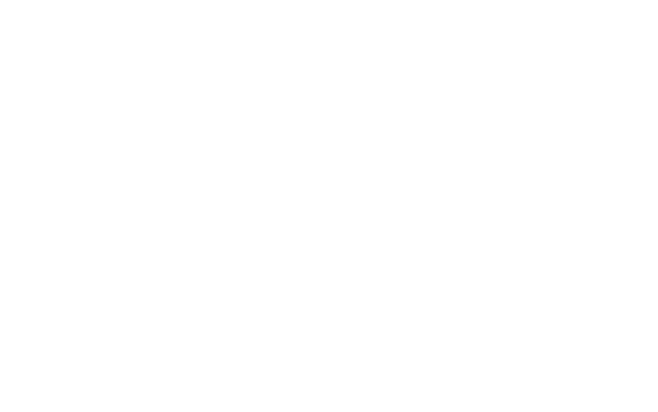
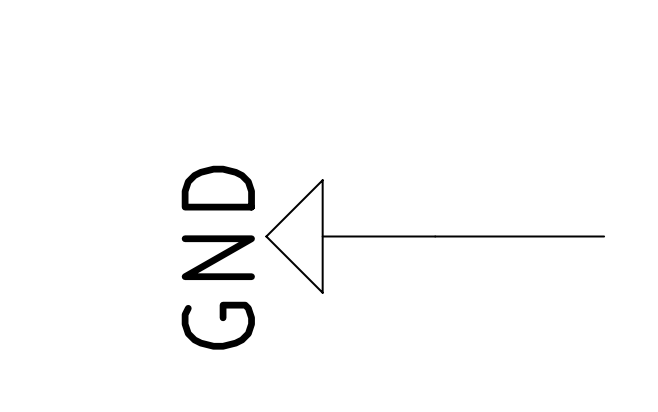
power symbol: none -> GND (350, 236)
wire: none -> (435, 236) (604, 236)

